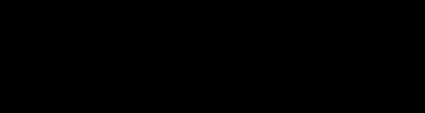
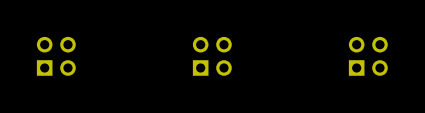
part: none -> (56, 56)
part: none -> (212, 56)
part: none -> (368, 56)

